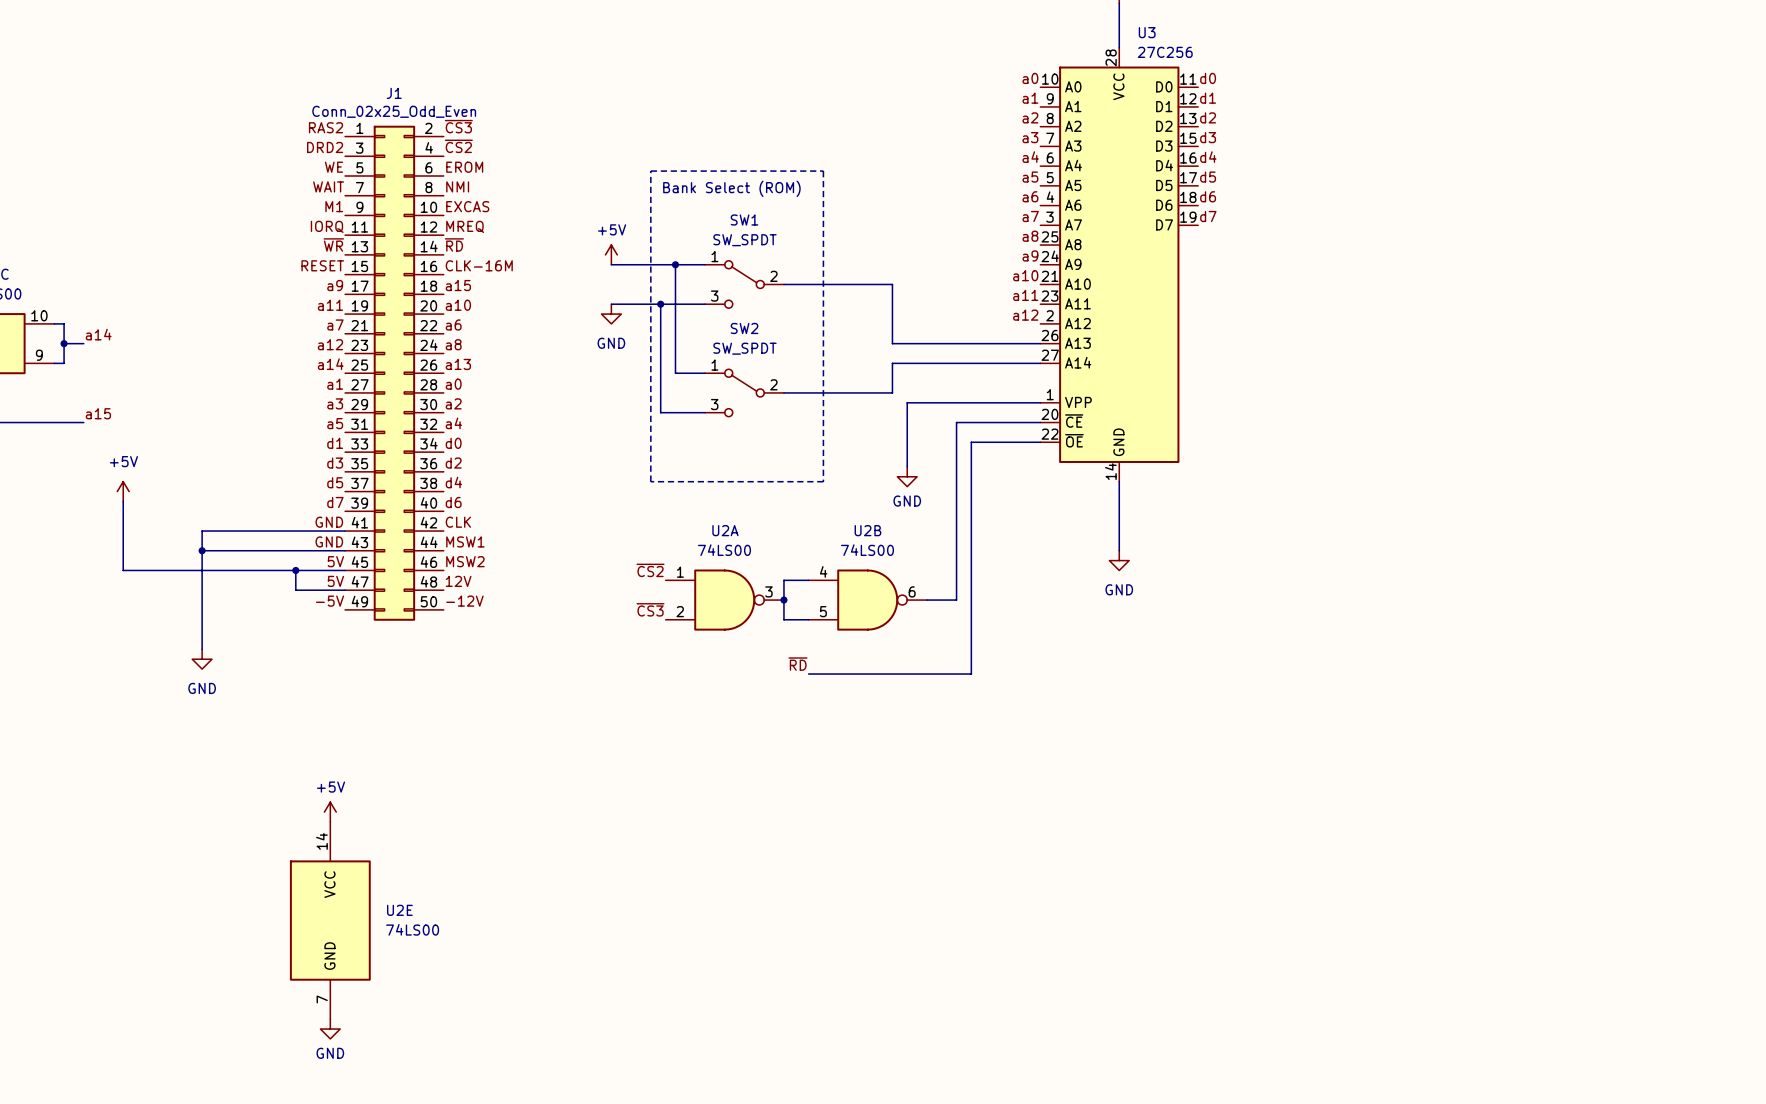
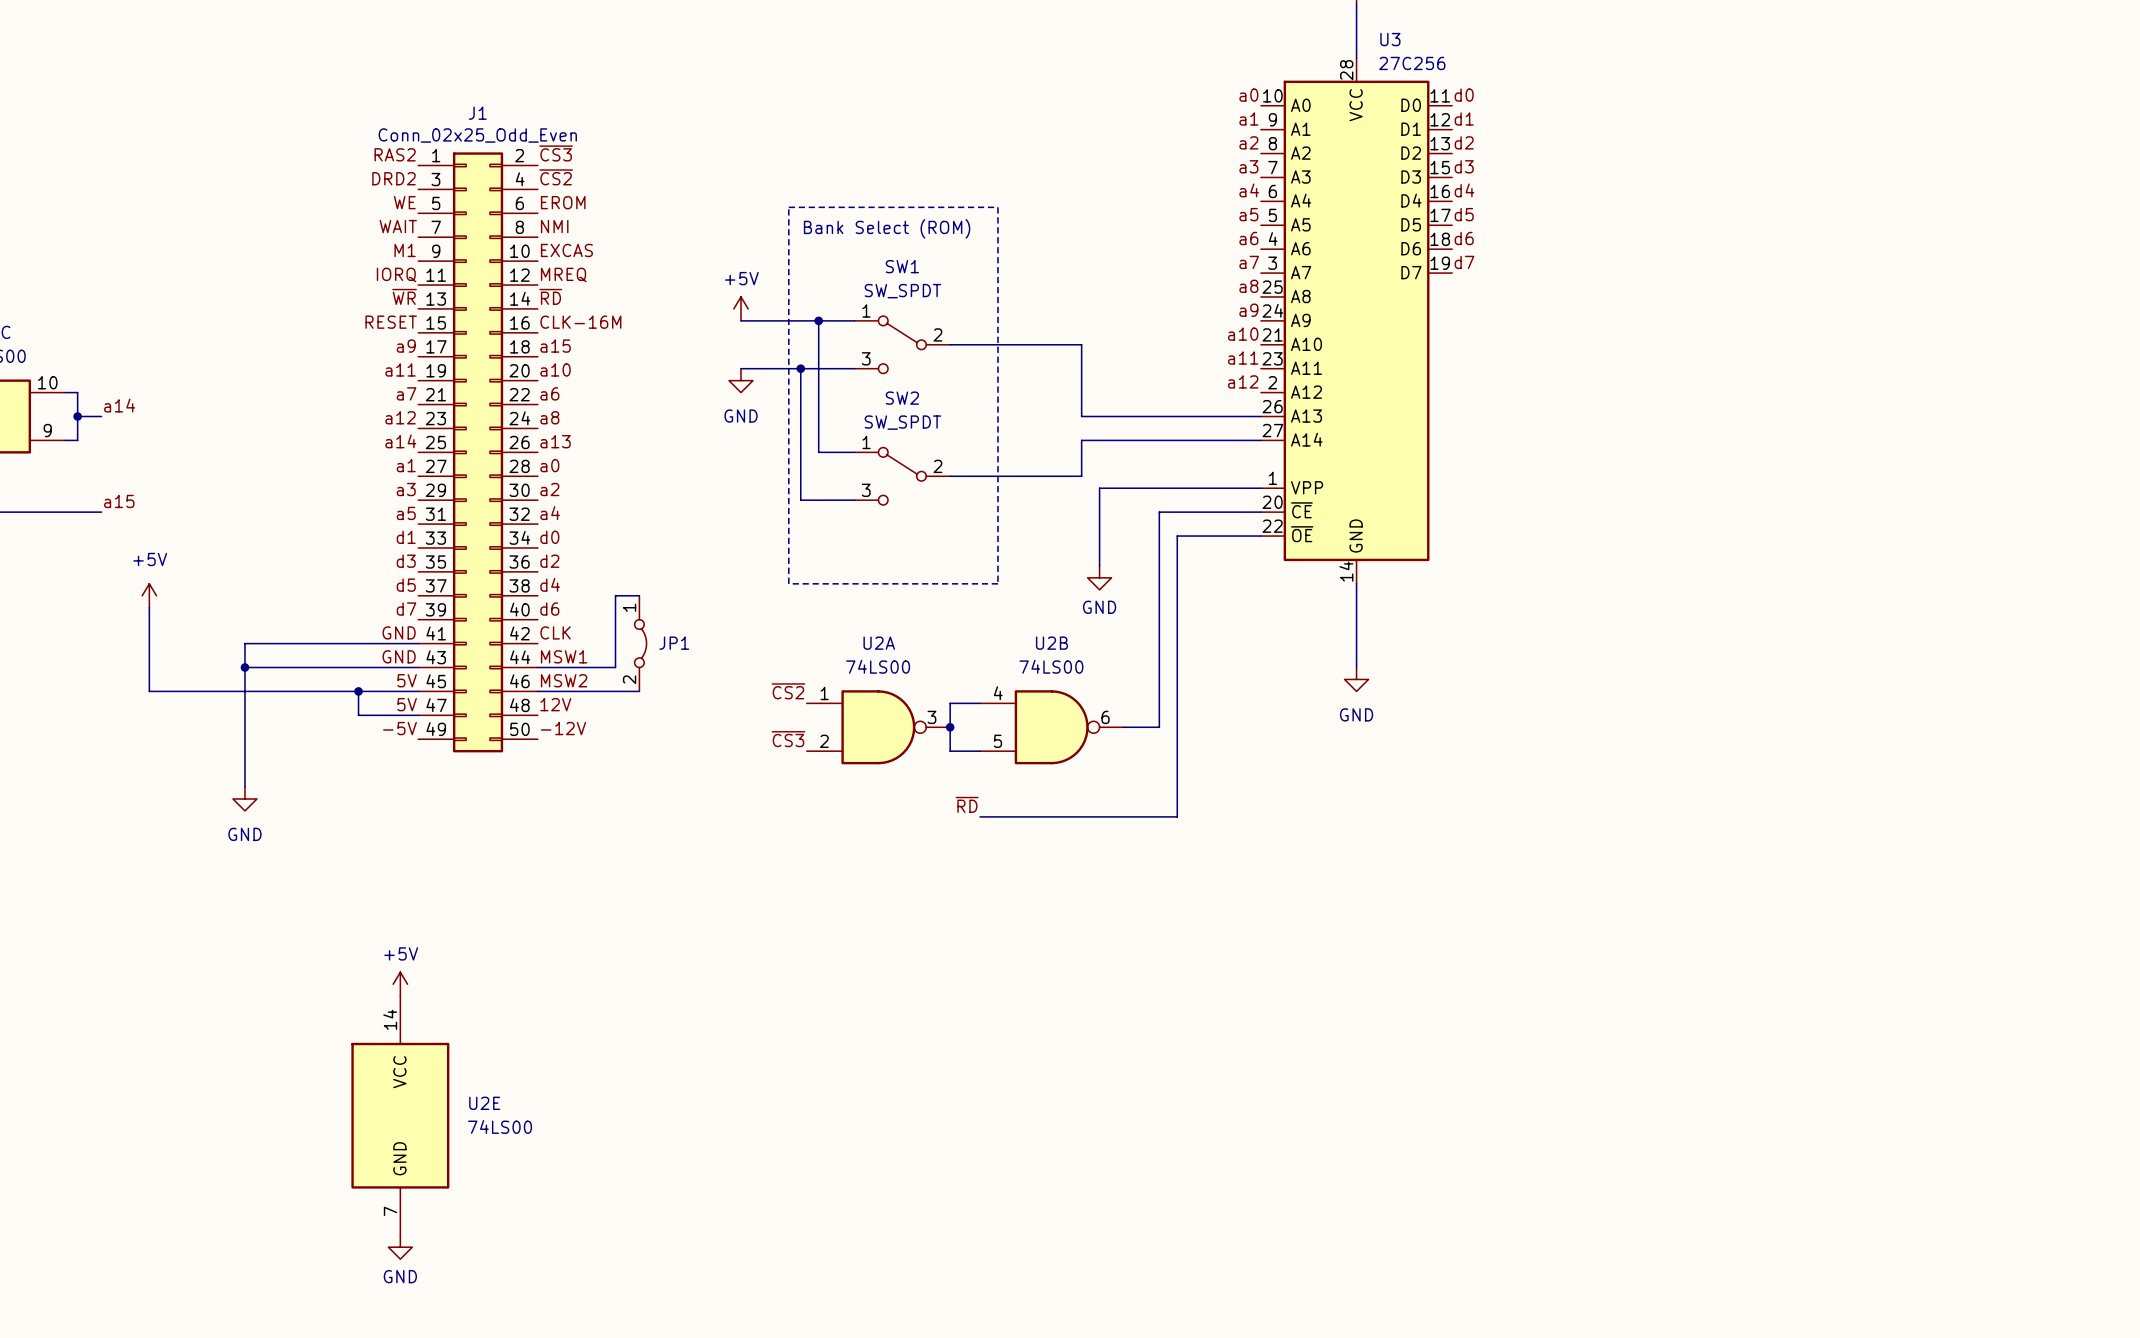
wire: none -> (639, 595) (615, 595) (615, 667) (537, 667)
JP1: none -> (640, 643)
wire: none -> (537, 691) (639, 691)

